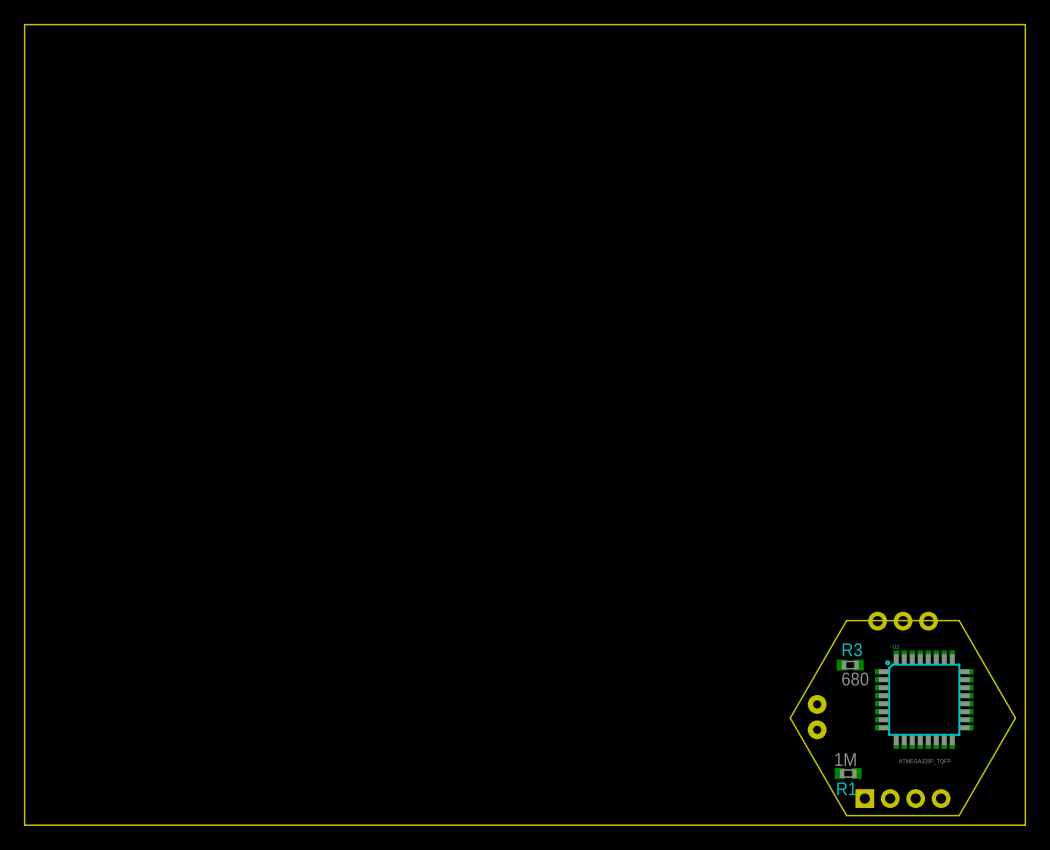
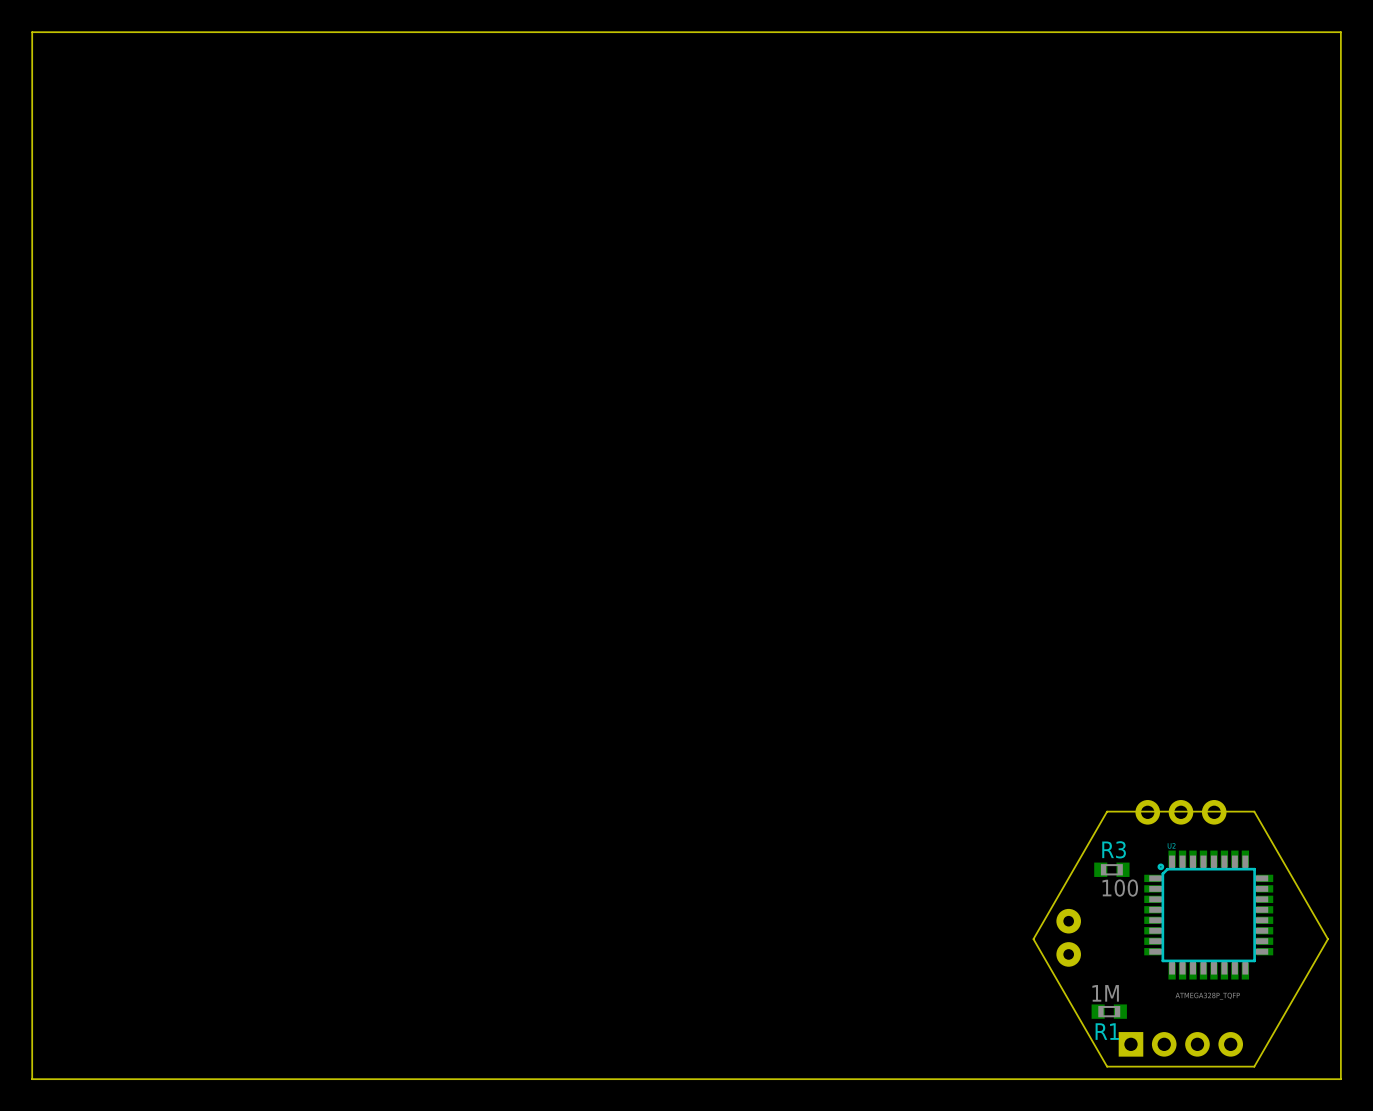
R3 value: 680 (855, 679) -> 100 (1120, 888)

